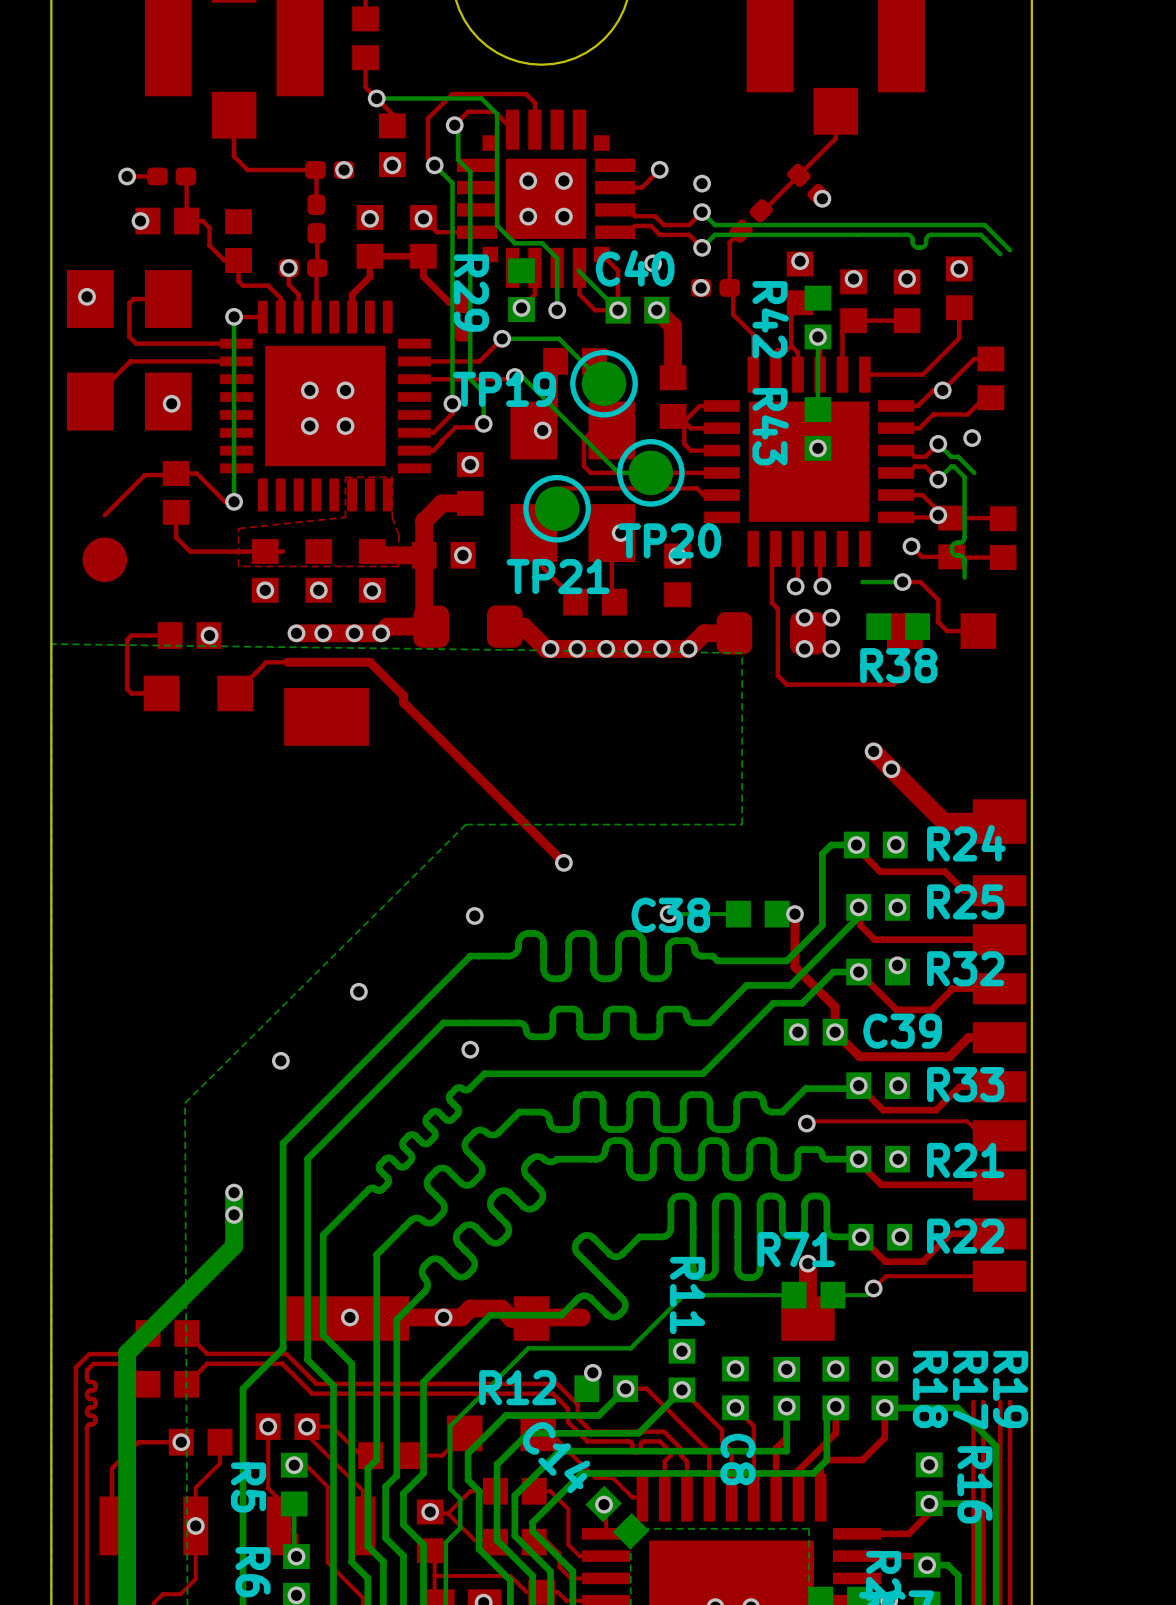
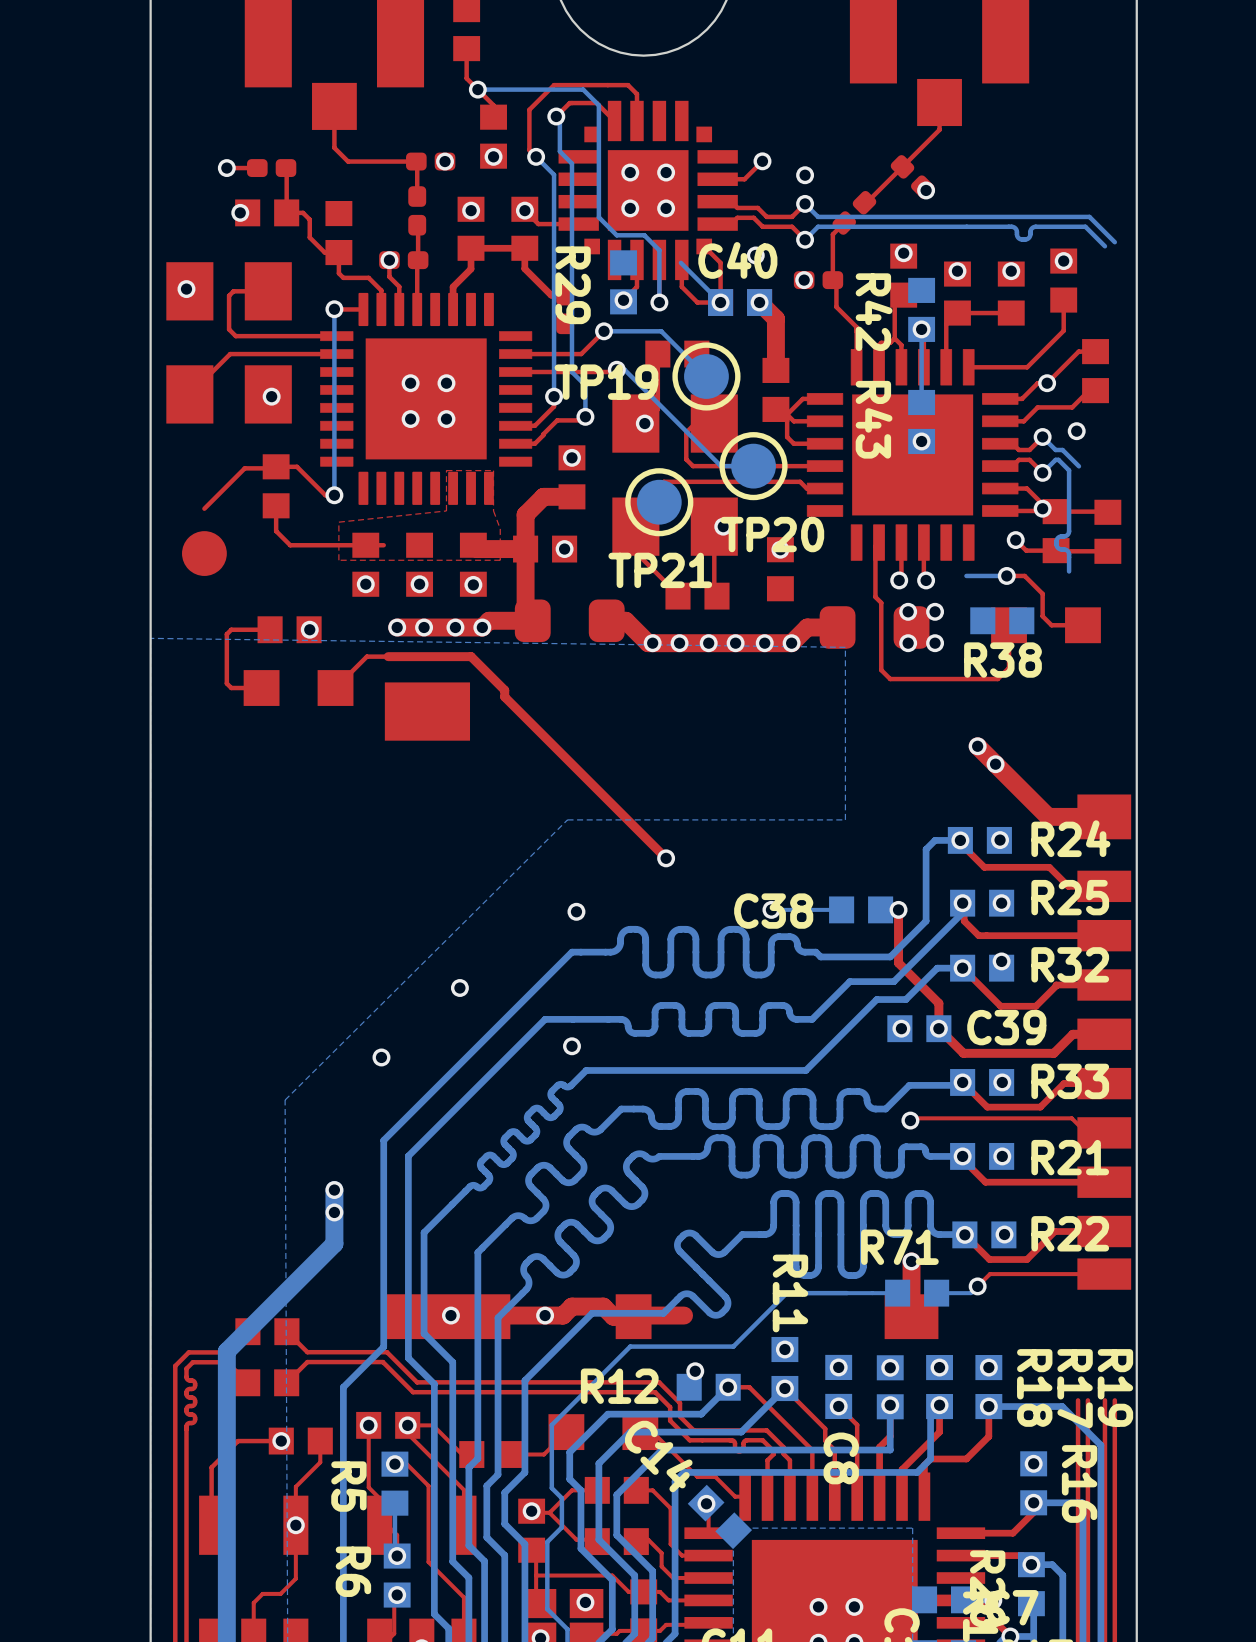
bottom track: (572, 1482) (532, 1522) (532, 1531) (572, 1571) -> (675, 1481) (675, 1571)

